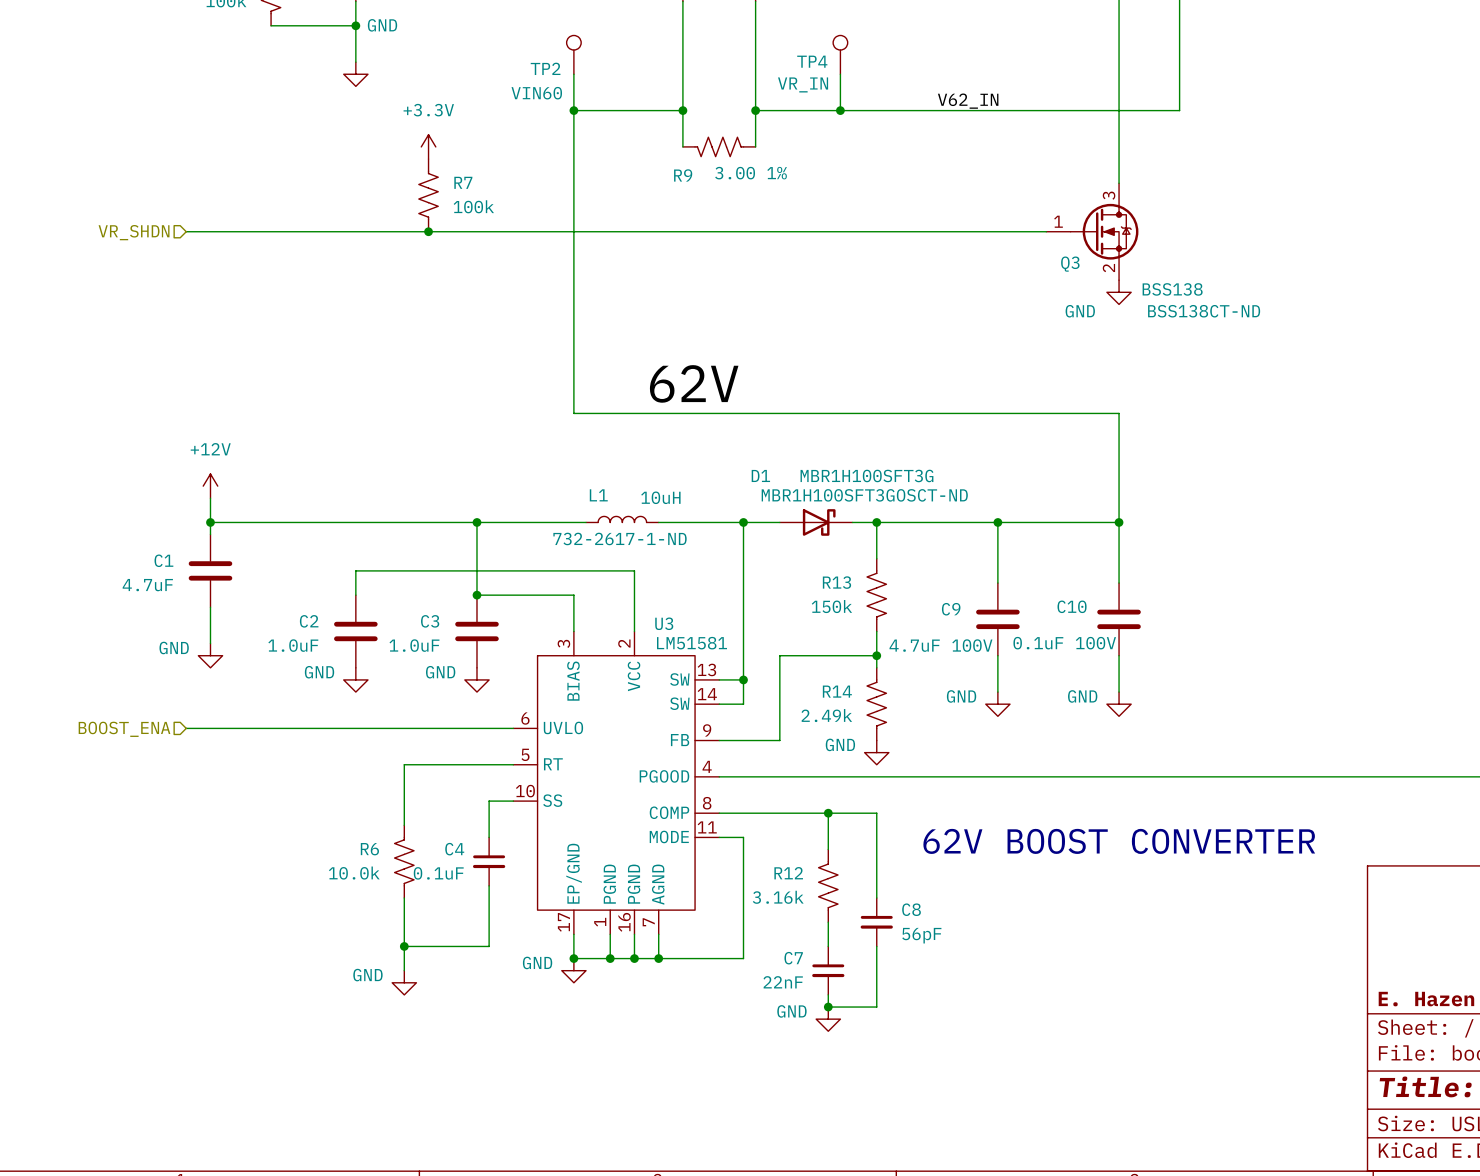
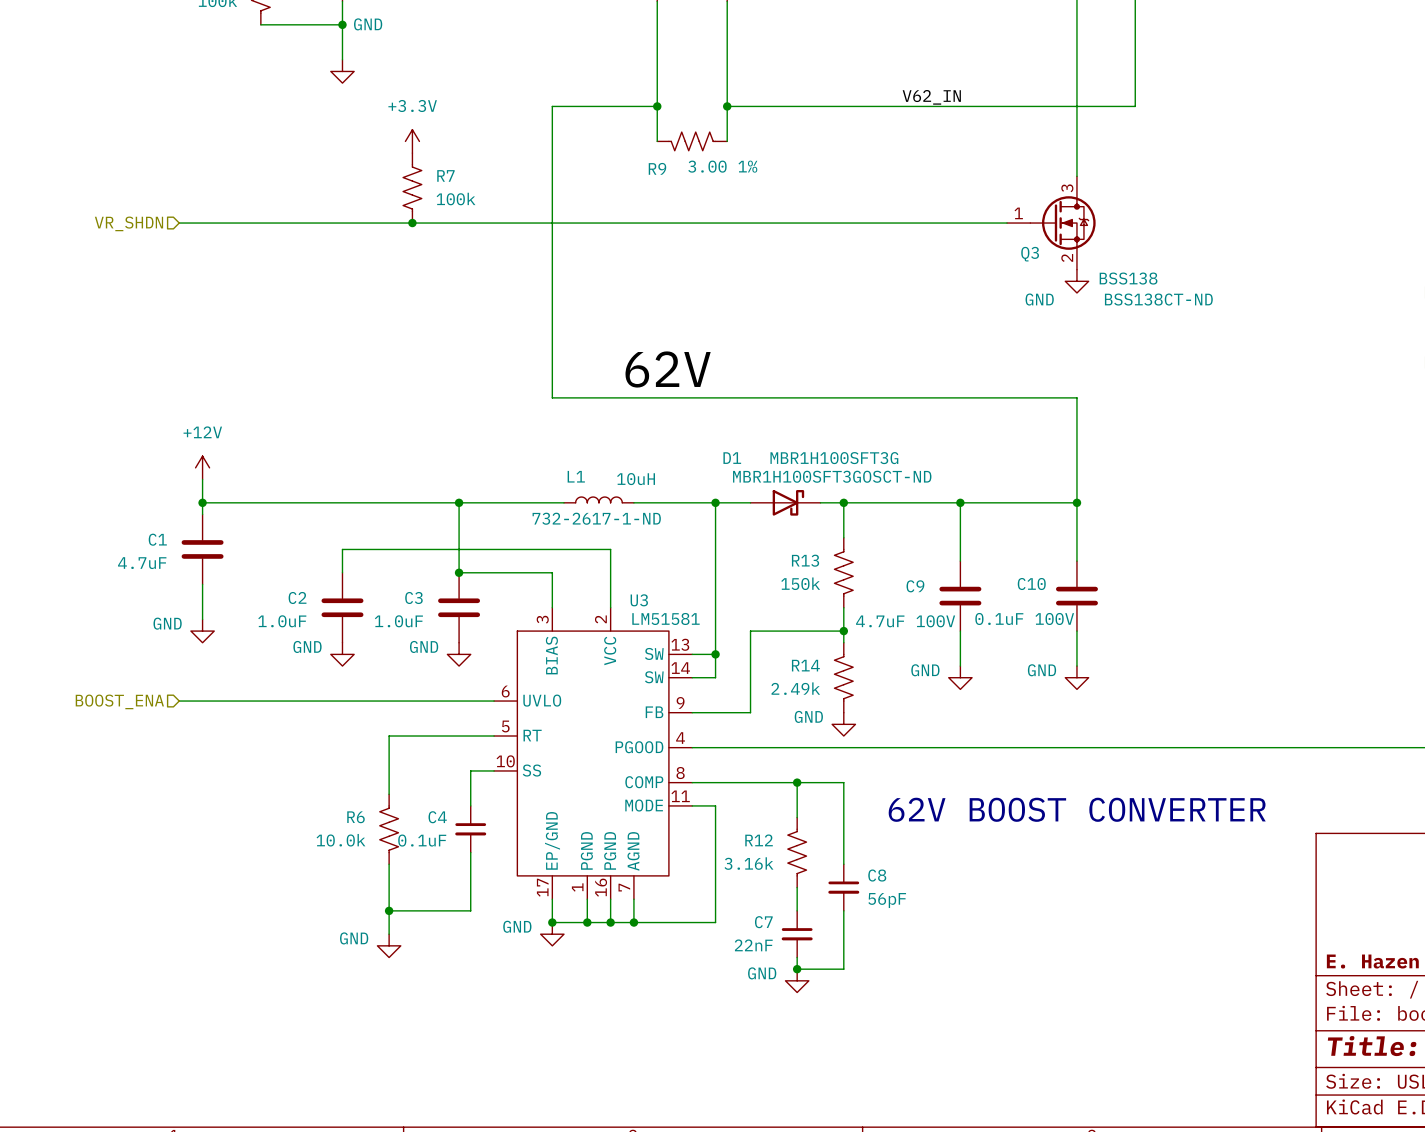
TP2: VIN60 (573, 54) -> none
TP4: VR_IN (840, 54) -> none
wire: (573, 74) (573, 110) -> none
wire: (840, 74) (840, 110) -> none
junction: (573, 110) -> none
junction: (840, 110) -> none

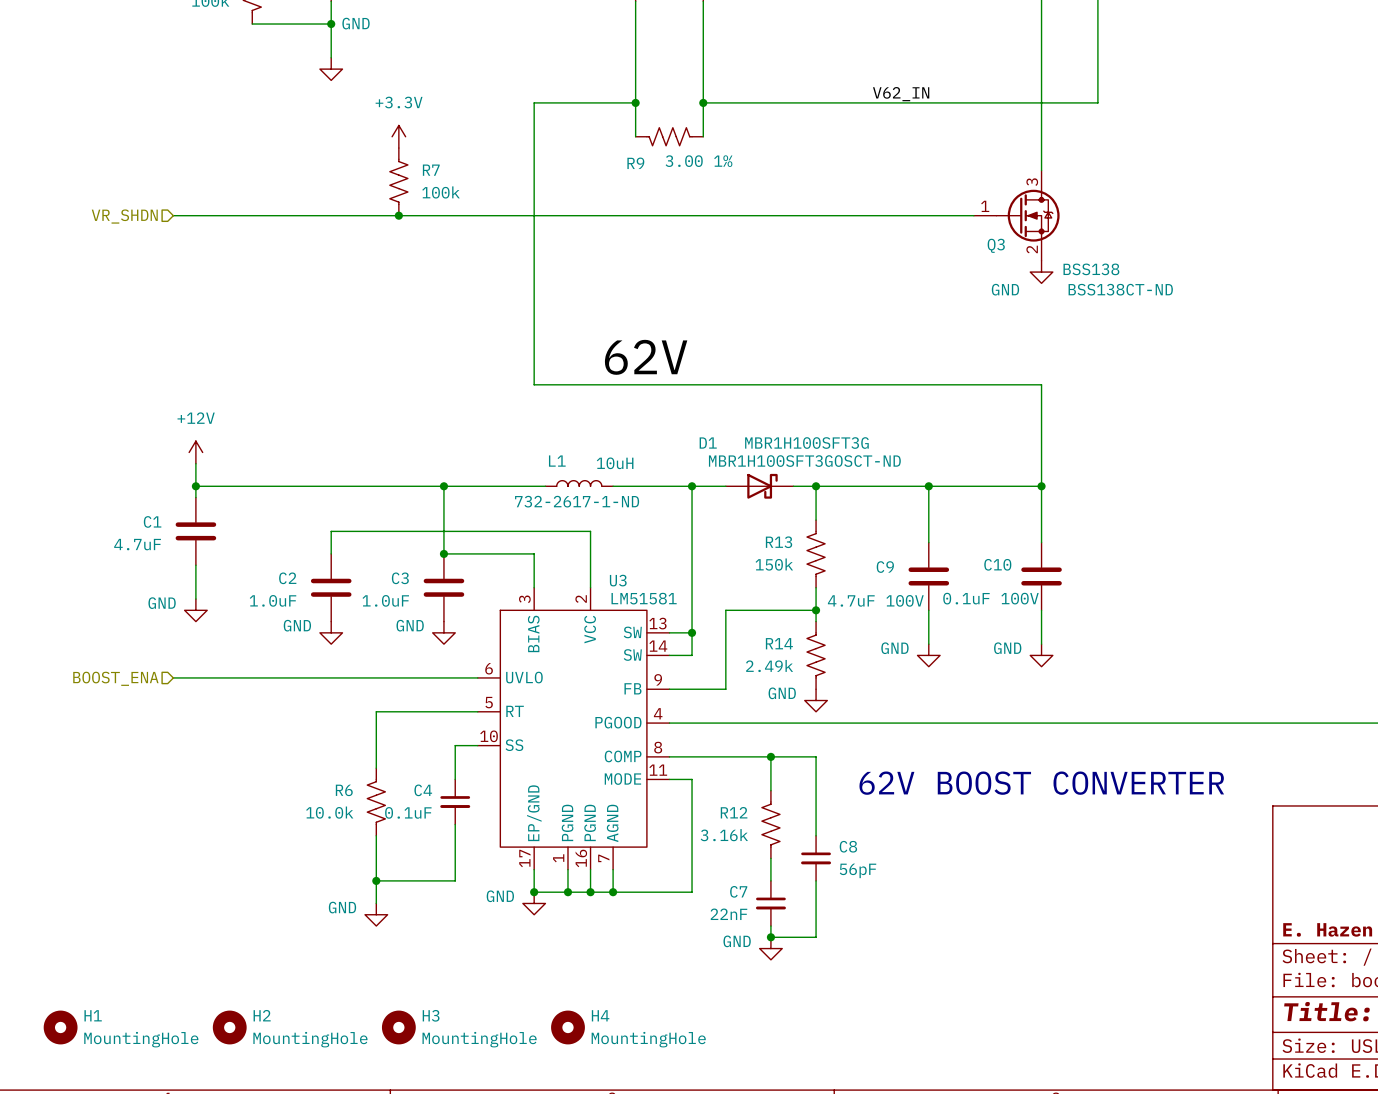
H1: none -> MountingHole (60, 1027)
H2: none -> MountingHole (229, 1027)
H3: none -> MountingHole (398, 1027)
H4: none -> MountingHole (567, 1027)

